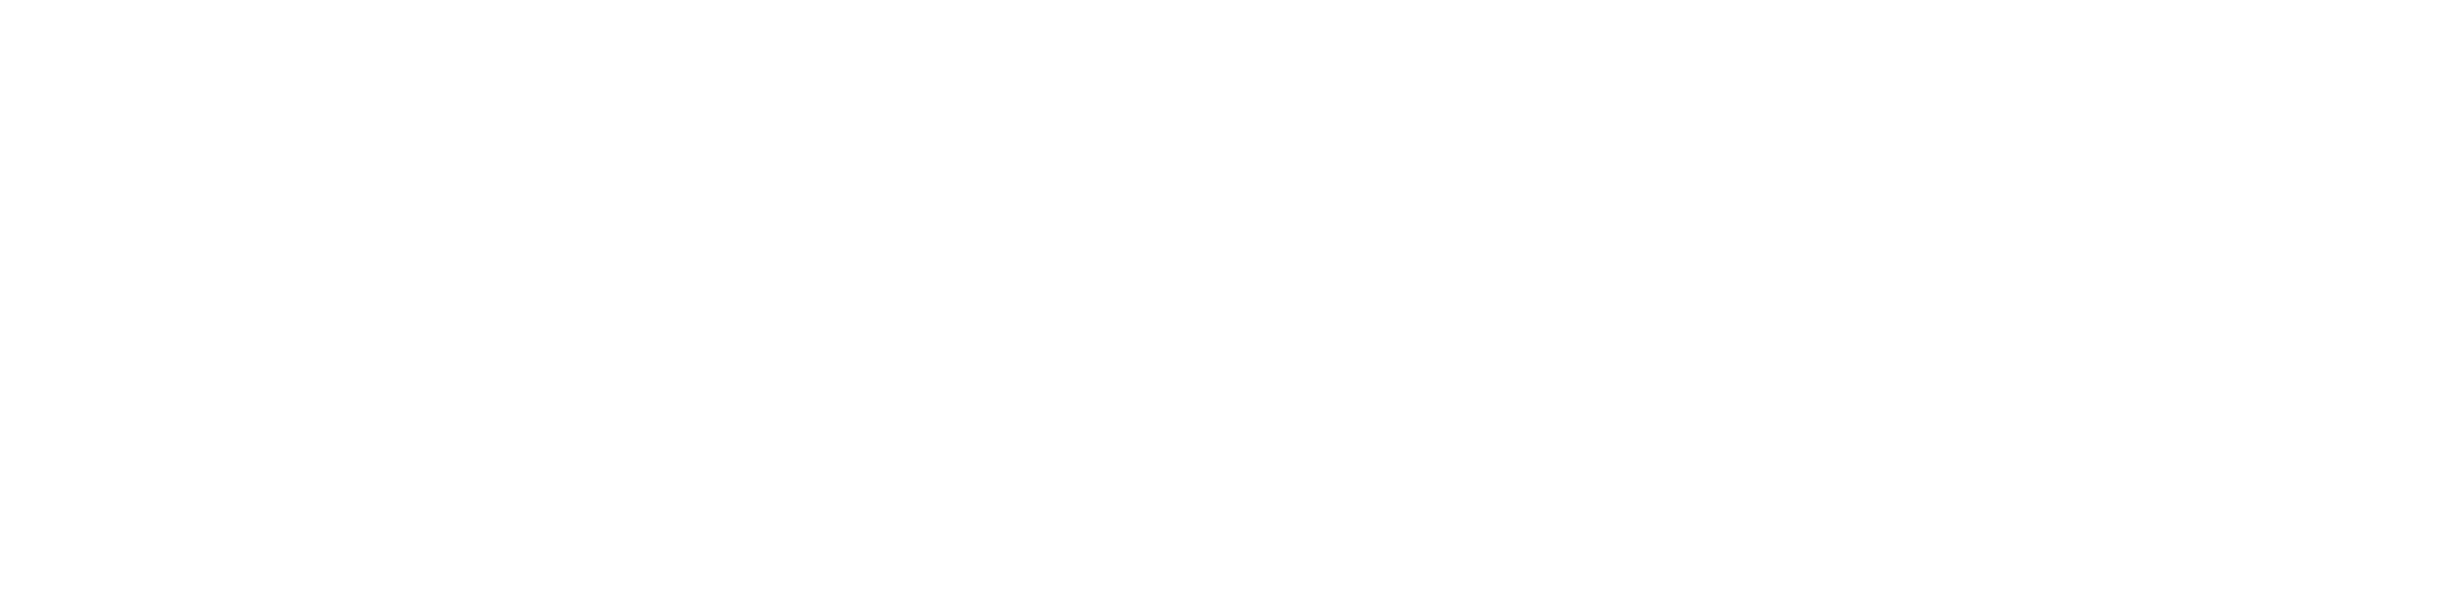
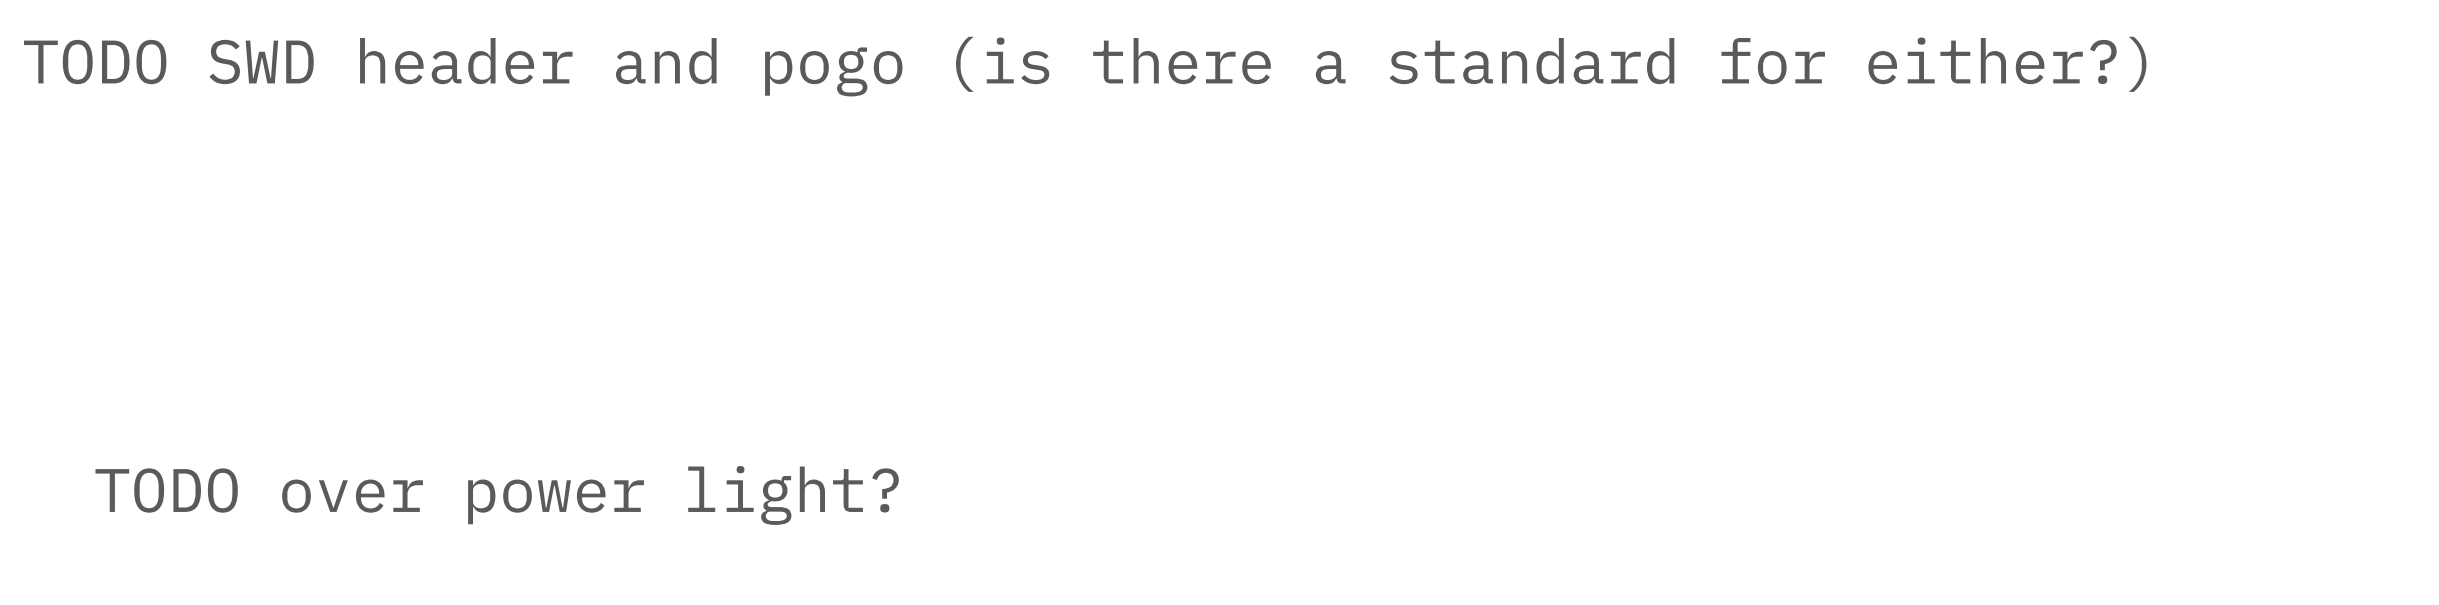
text: none -> TODO SWD header and pogo (is there a standard for either?) (1085, 66)
text: none -> TODO over power light? (497, 495)

